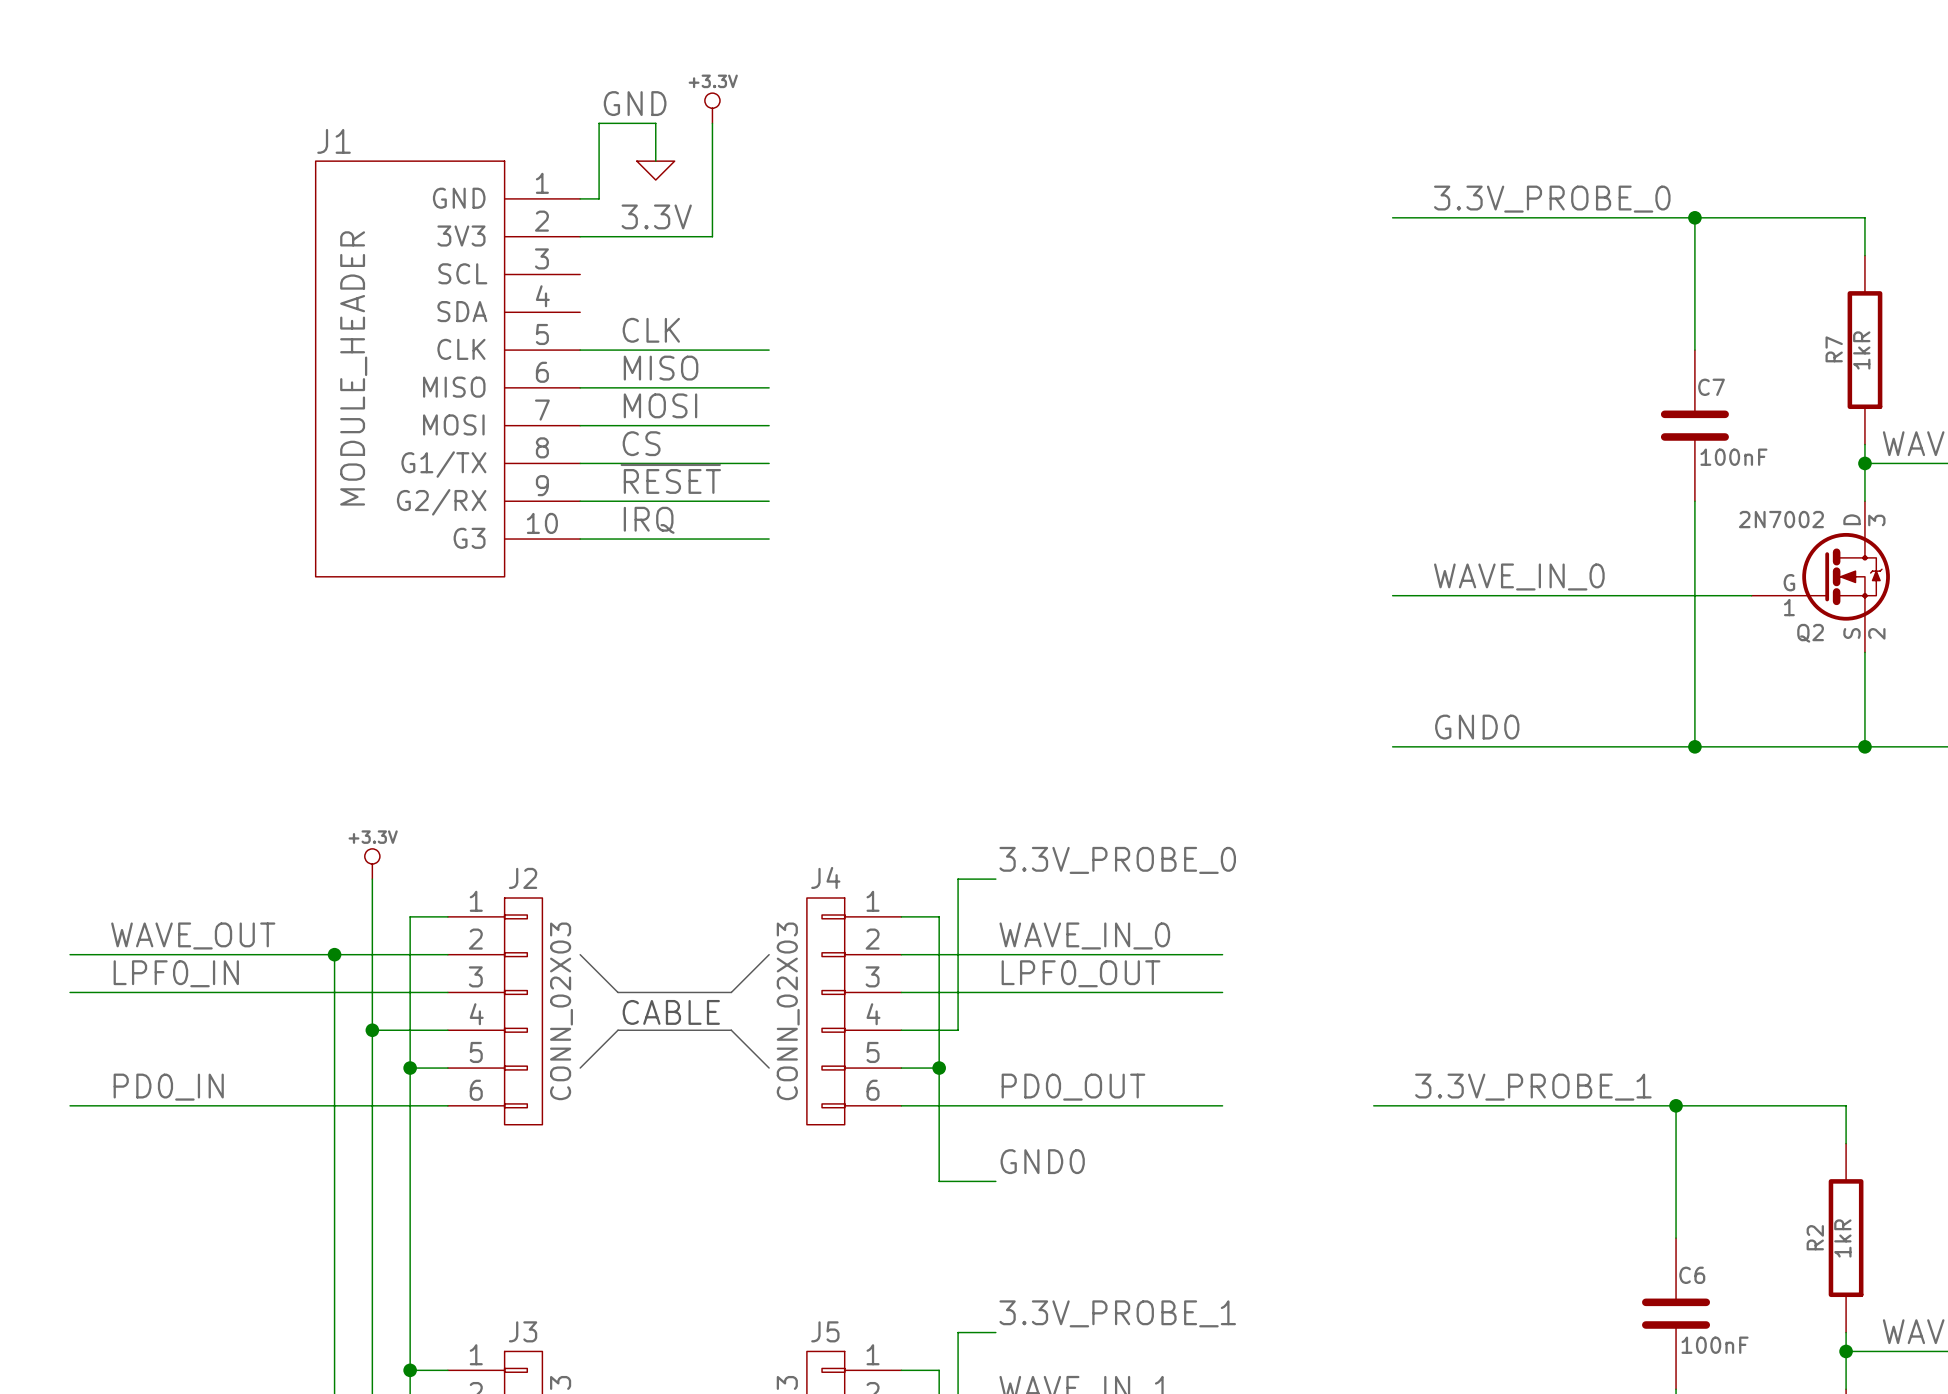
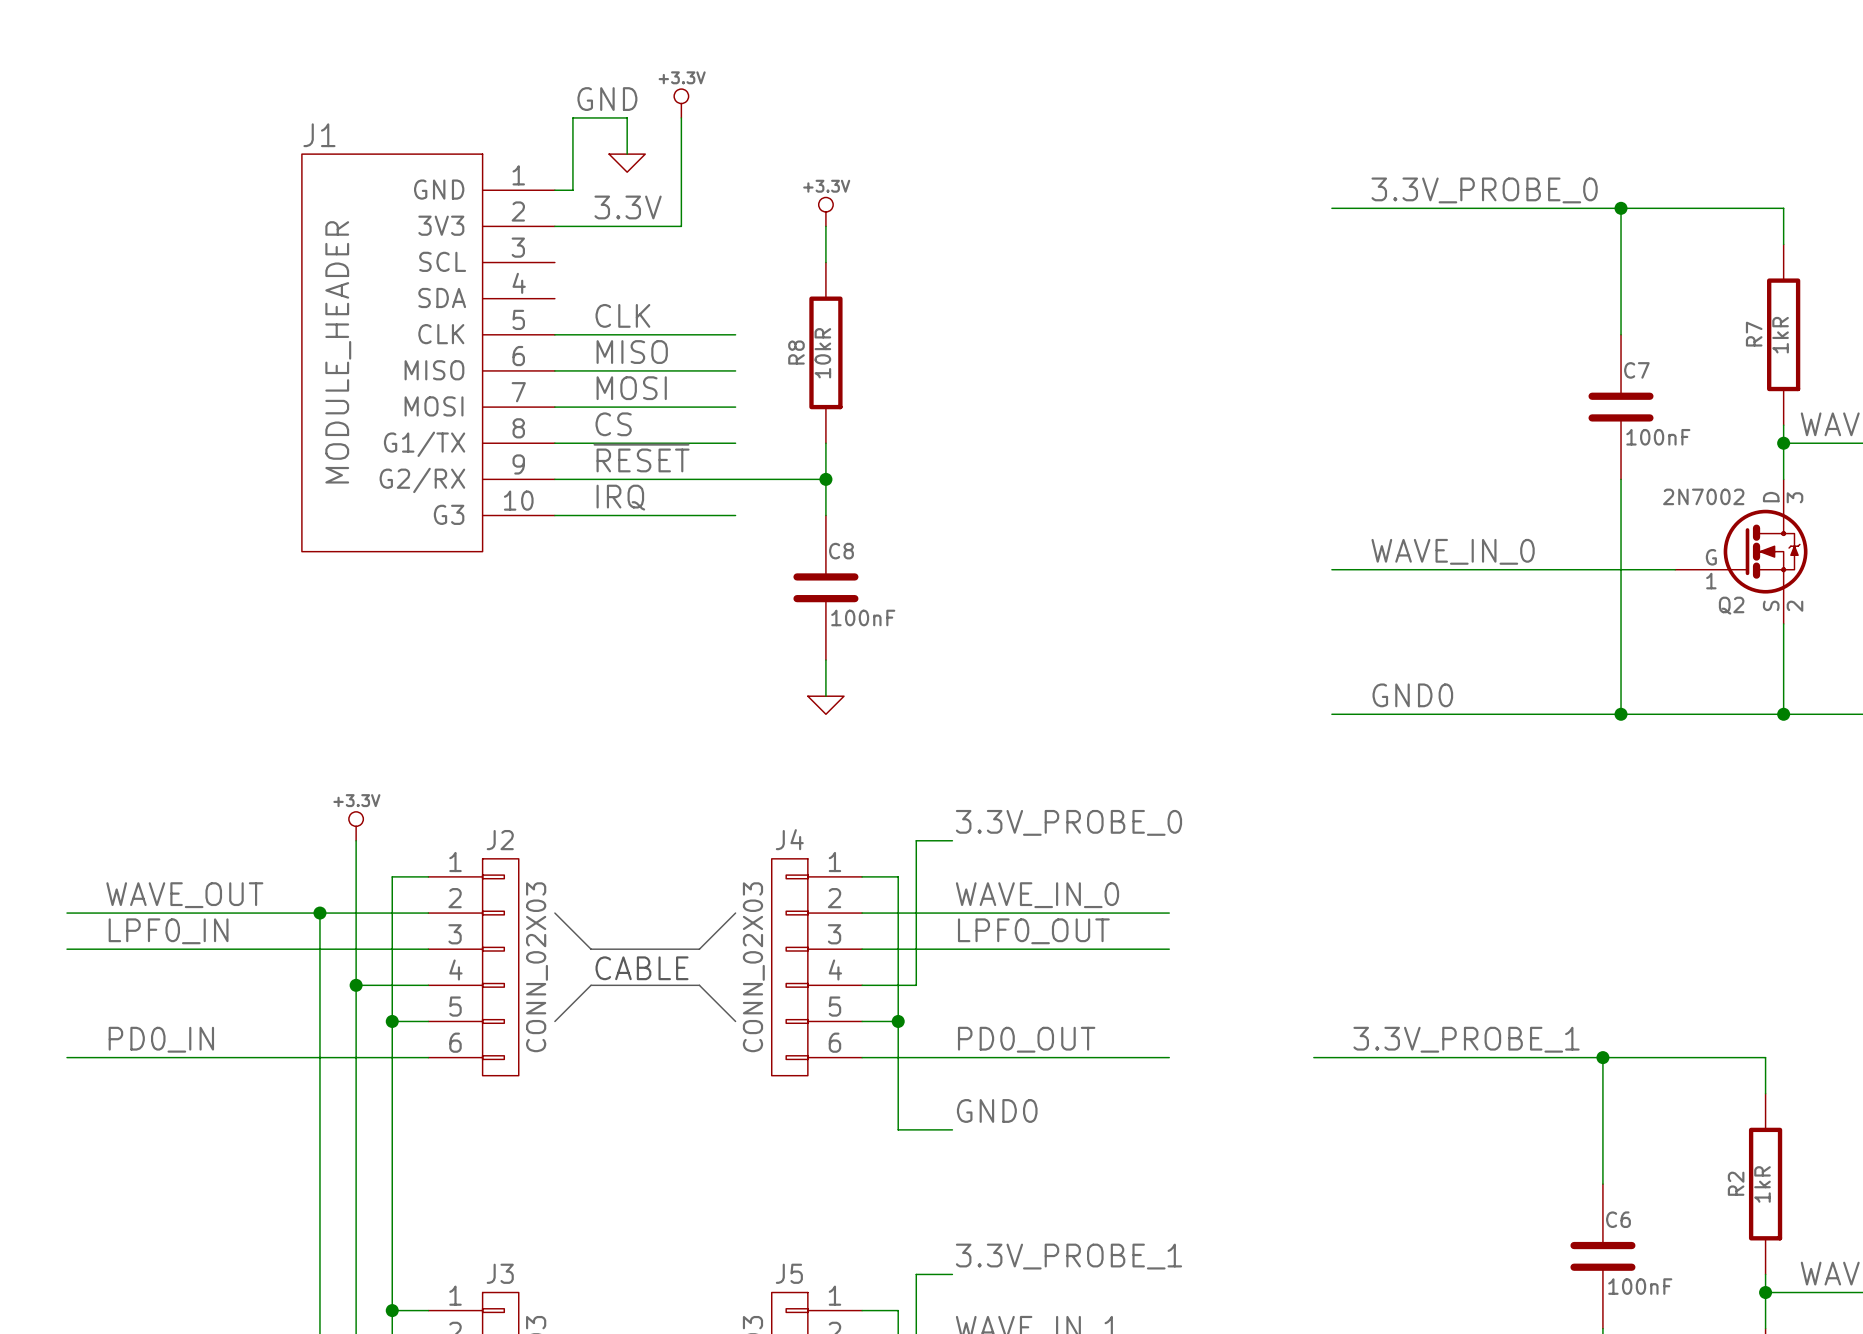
power symbol: none -> +3.3V (825, 211)
wire: none -> (825, 226) (825, 262)
R8: none -> 10kR (825, 352)
wire: none -> (825, 443) (825, 515)
wire: none -> (735, 479) (825, 479)
junction: none -> (825, 479)
C8: none -> 100nF (825, 587)
wire: none -> (825, 660) (825, 696)
power symbol: none -> (825, 705)

